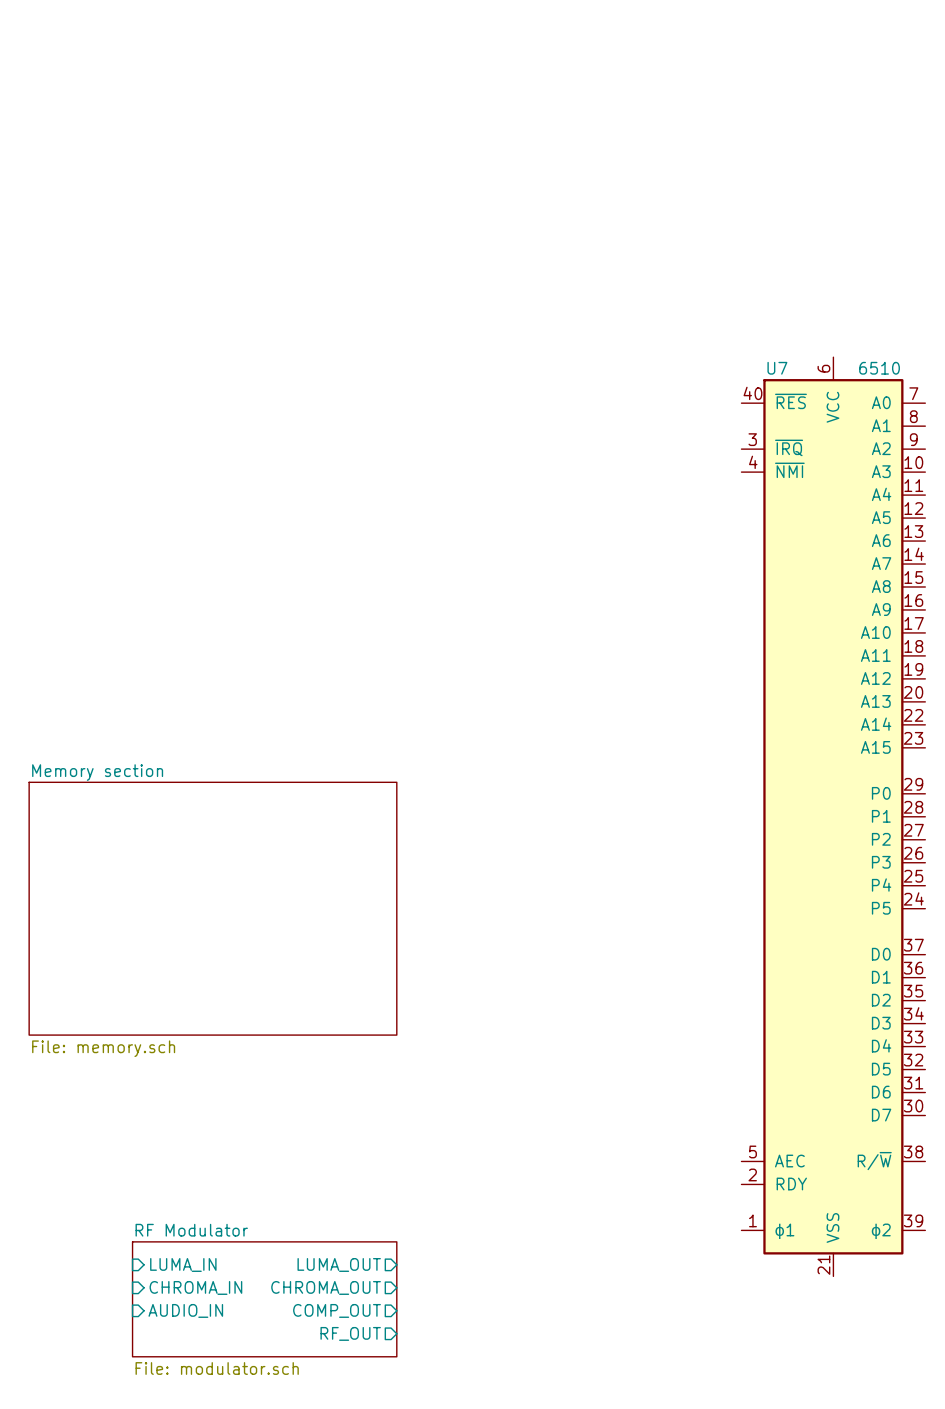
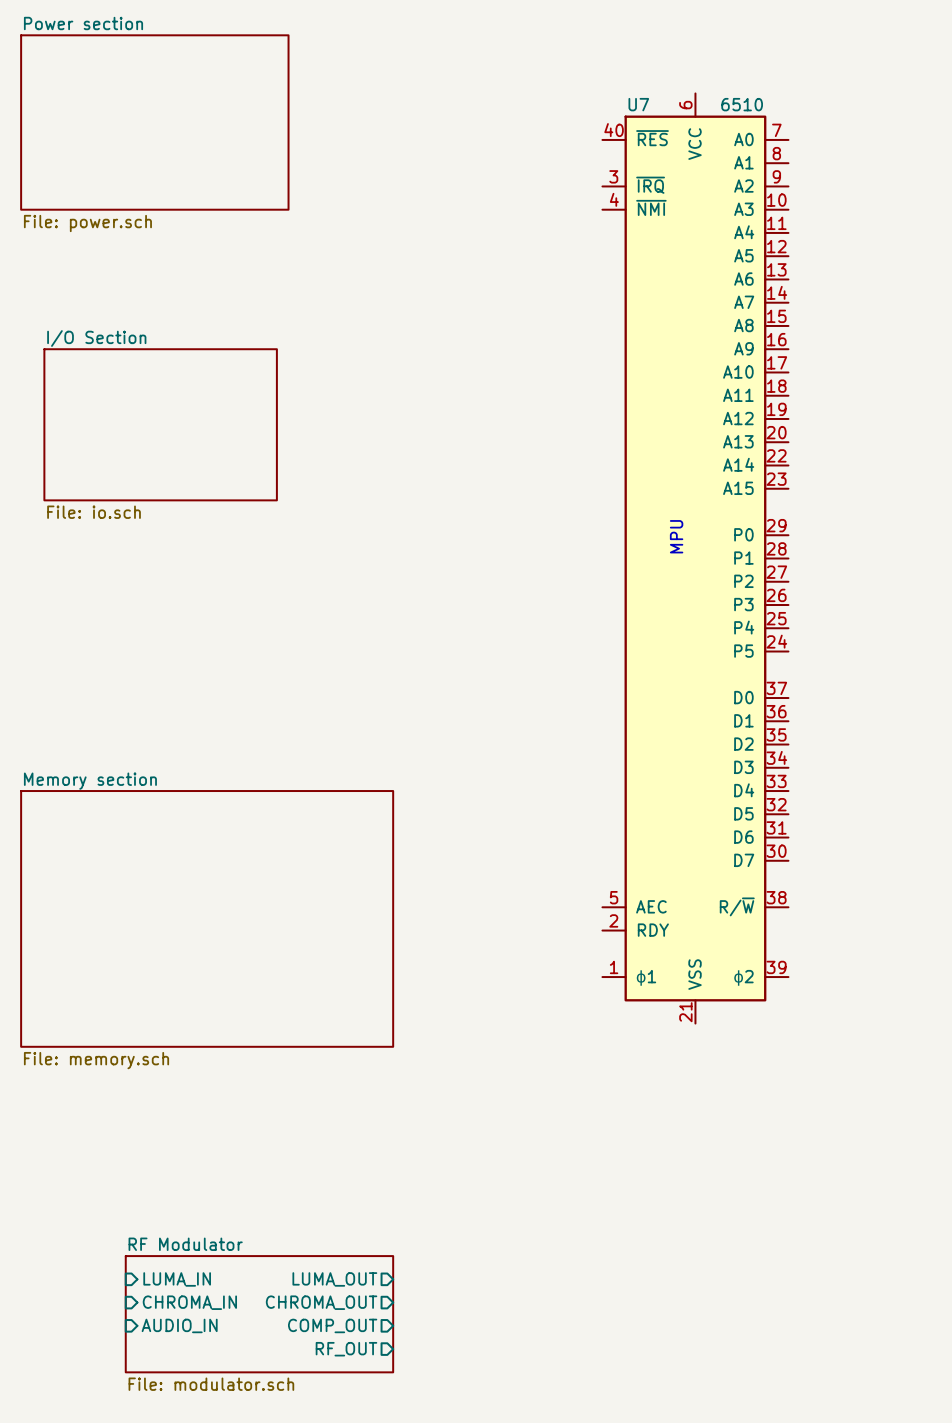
sheet Power section: none -> File: power.sch (154, 122)
sheet I/O Section: none -> File: io.sch (160, 424)
text: none -> MPU (676, 536)
U7 position: (833, 816) -> (695, 558)

